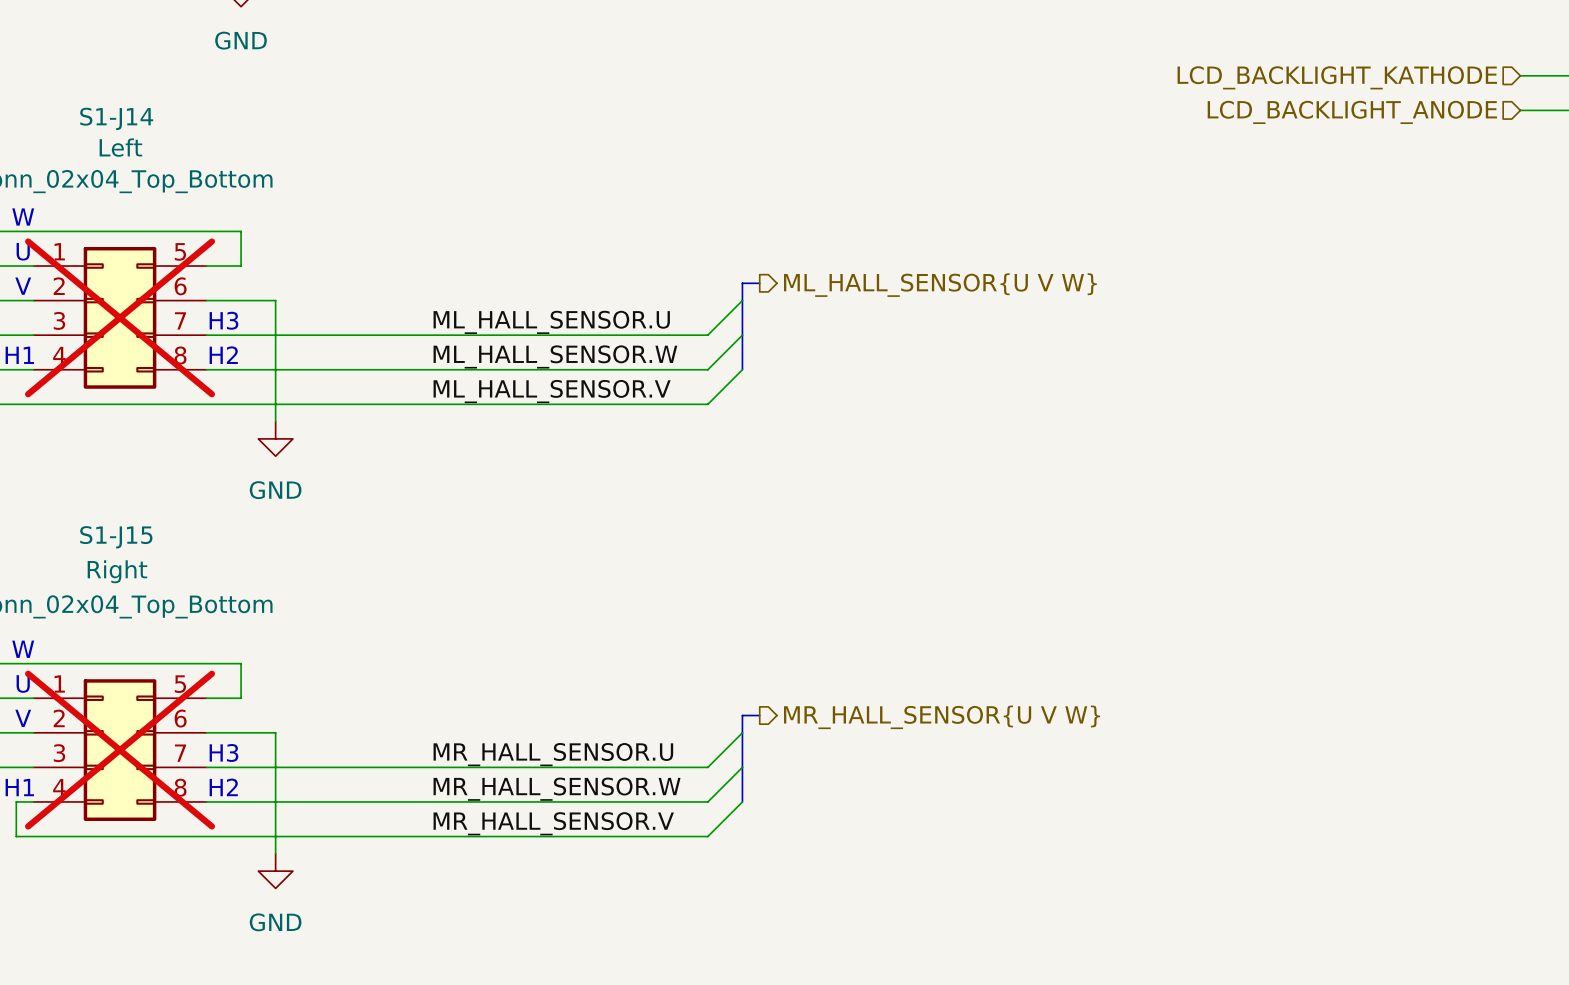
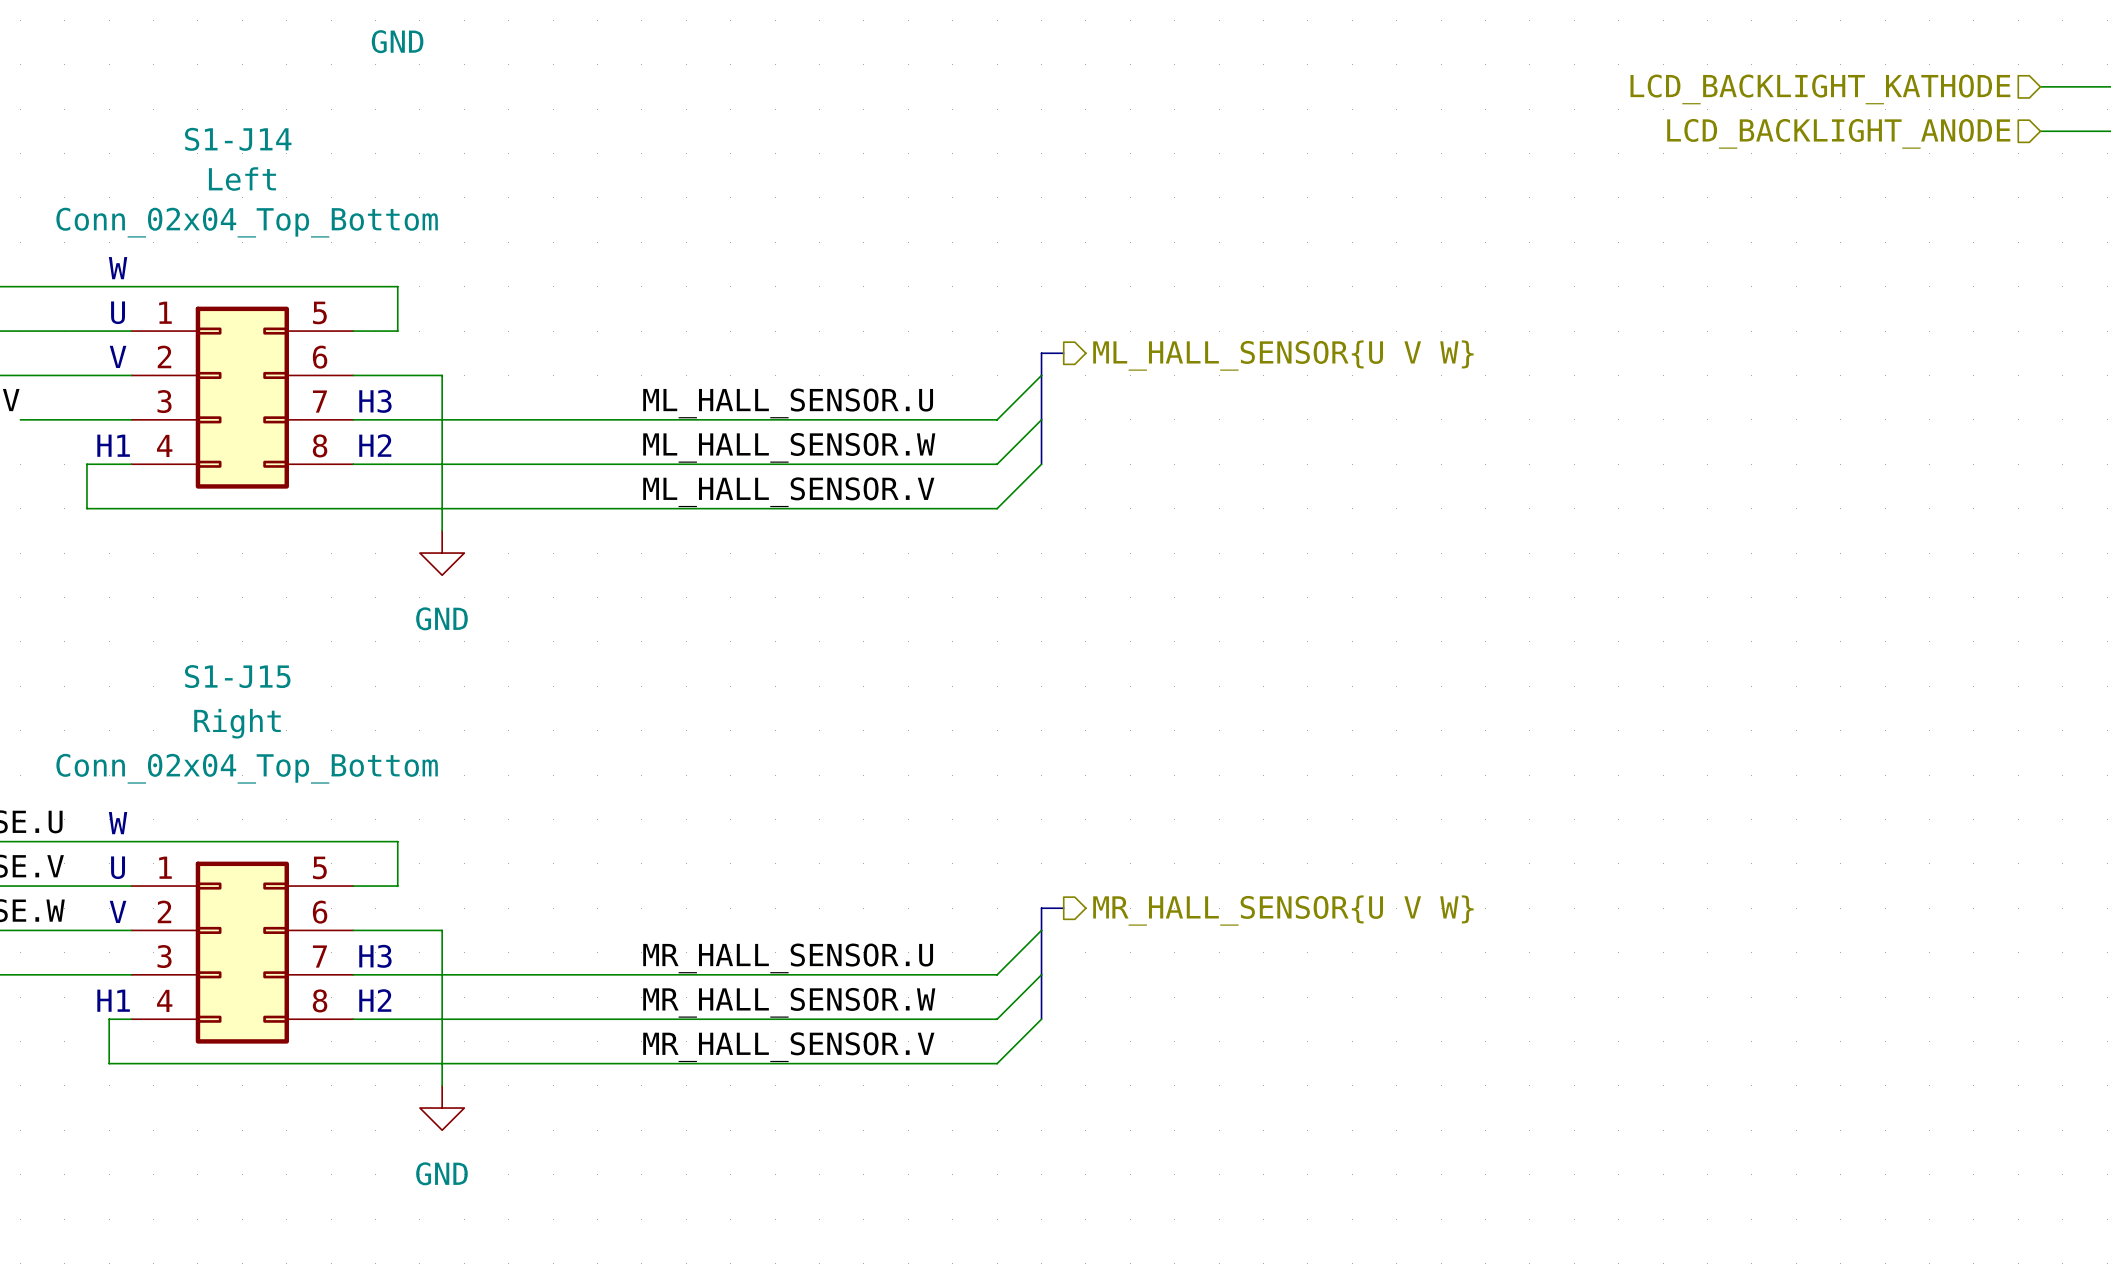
S1-J14 do-not-place cross: (120, 317) -> none
S1-J15 do-not-place cross: (120, 750) -> none

